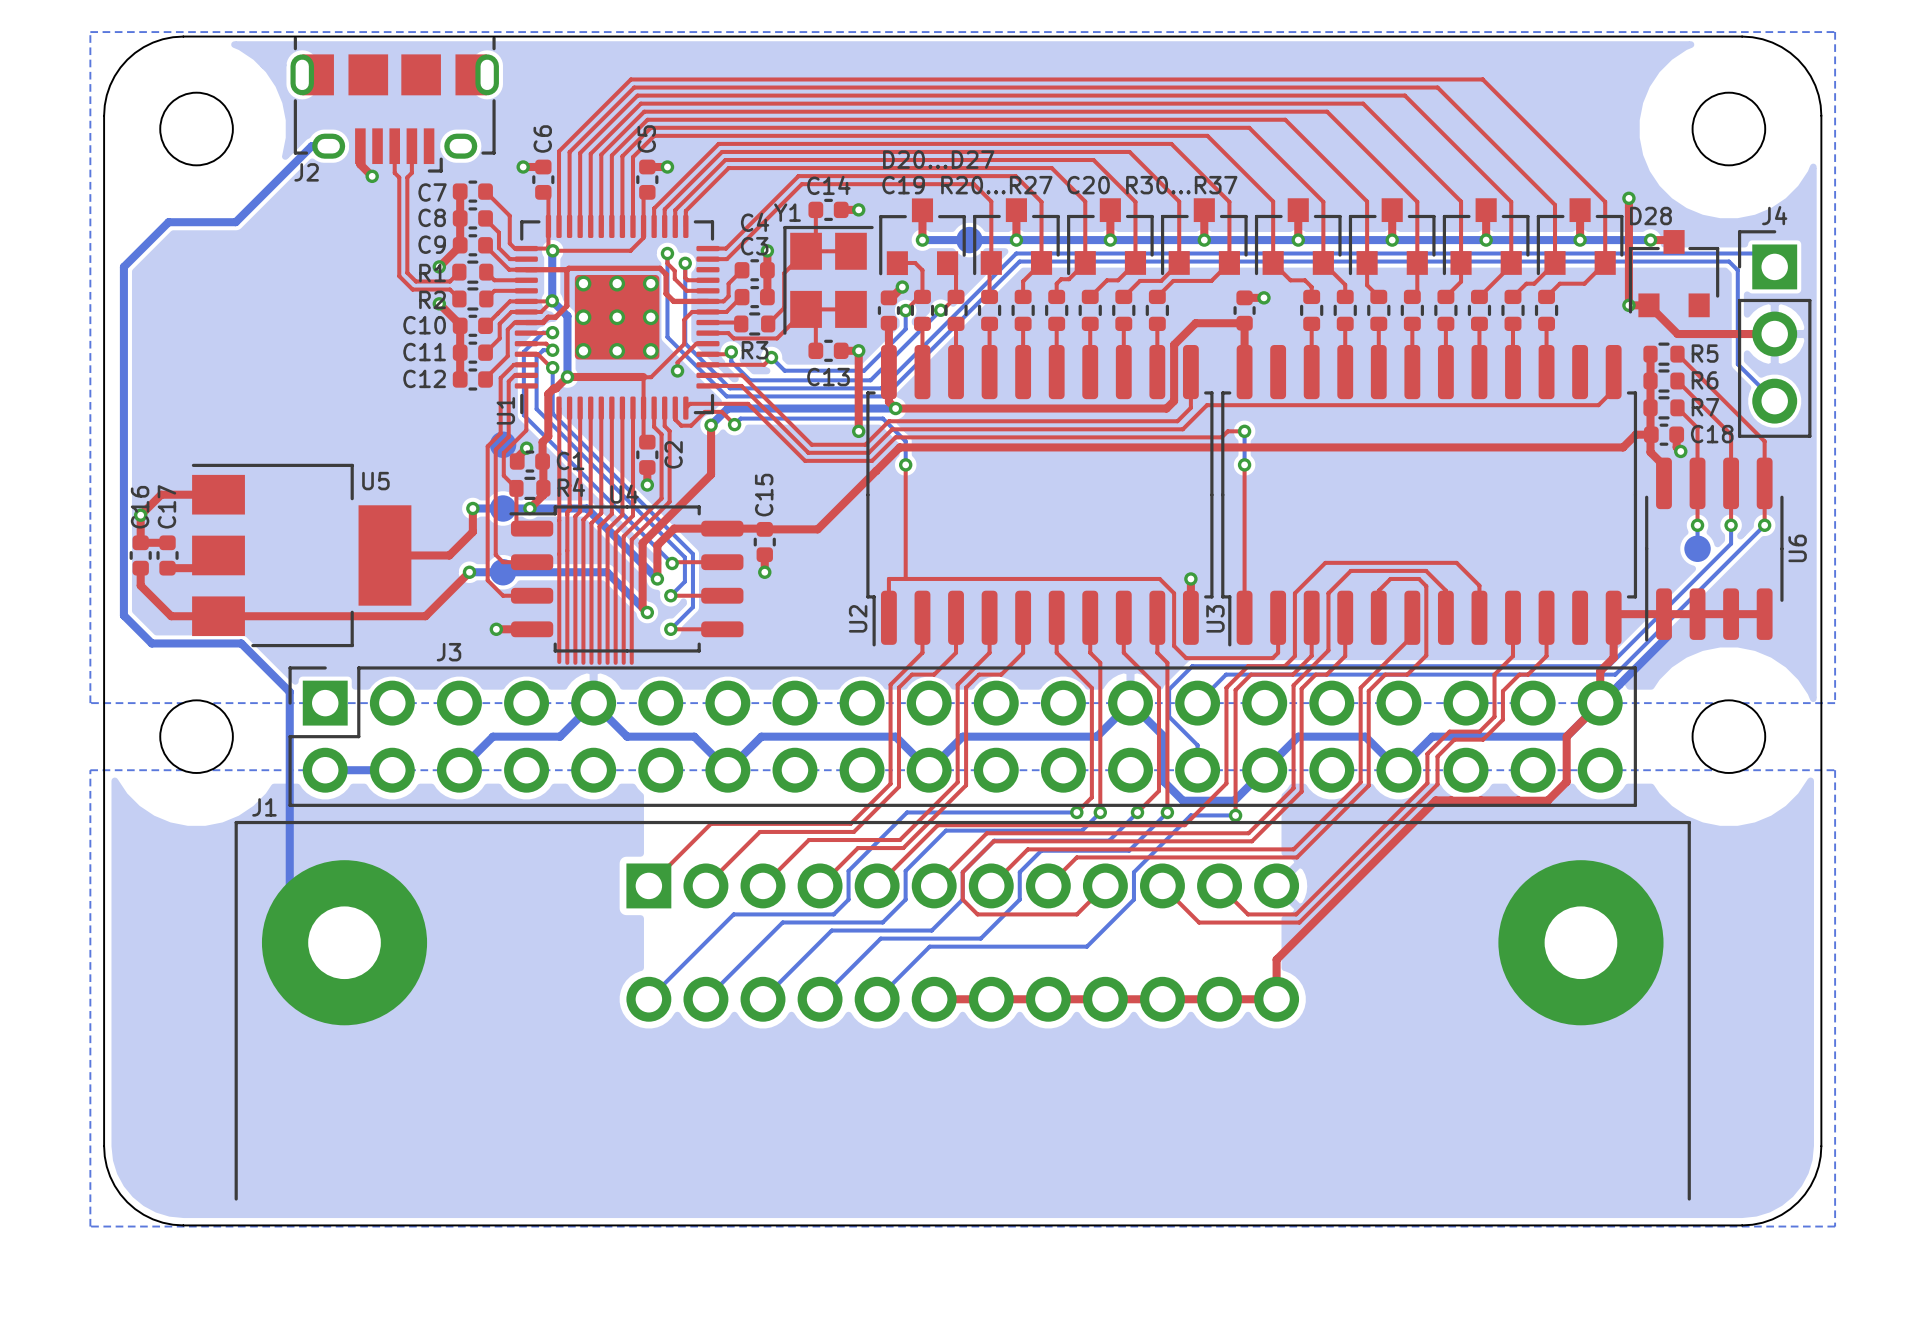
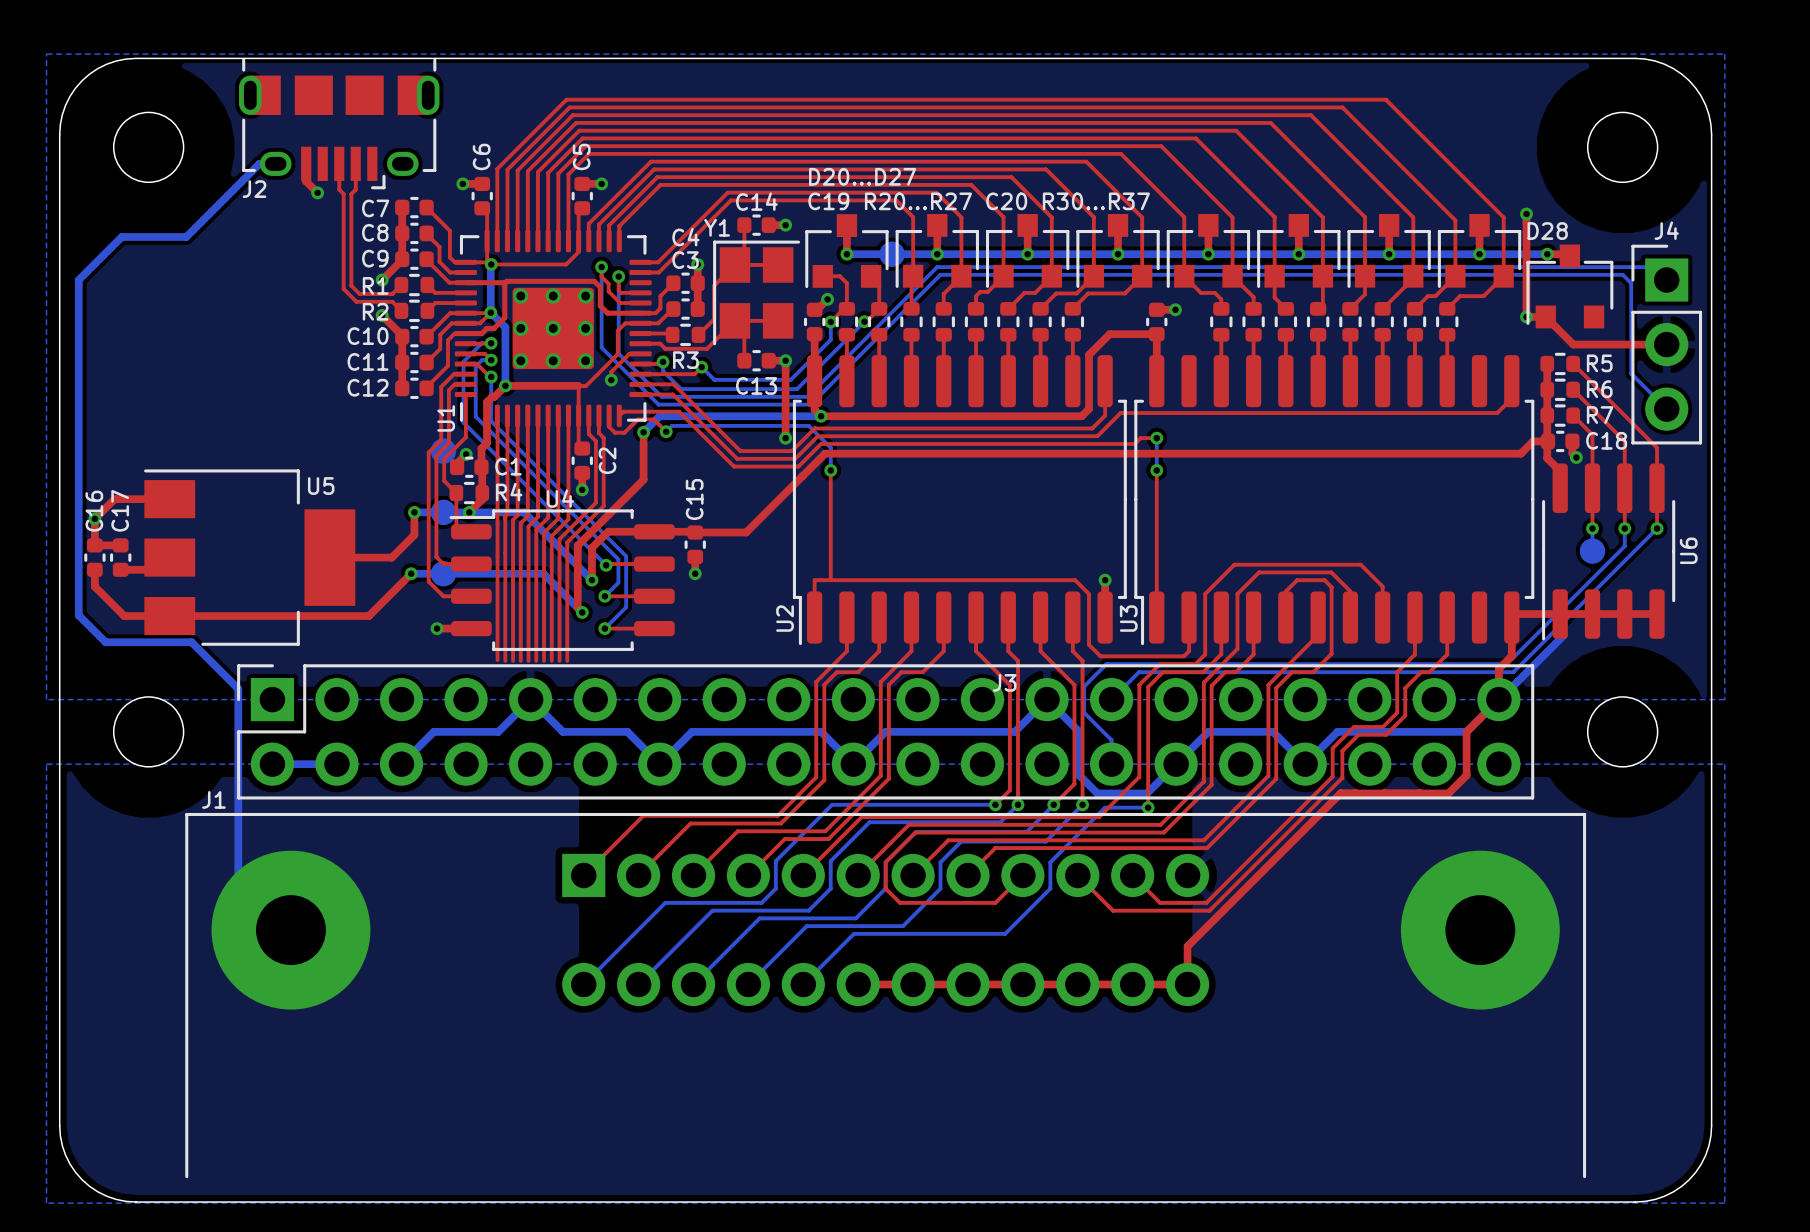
J3 name position: J3 (449, 652) -> J3 (1004, 682)

